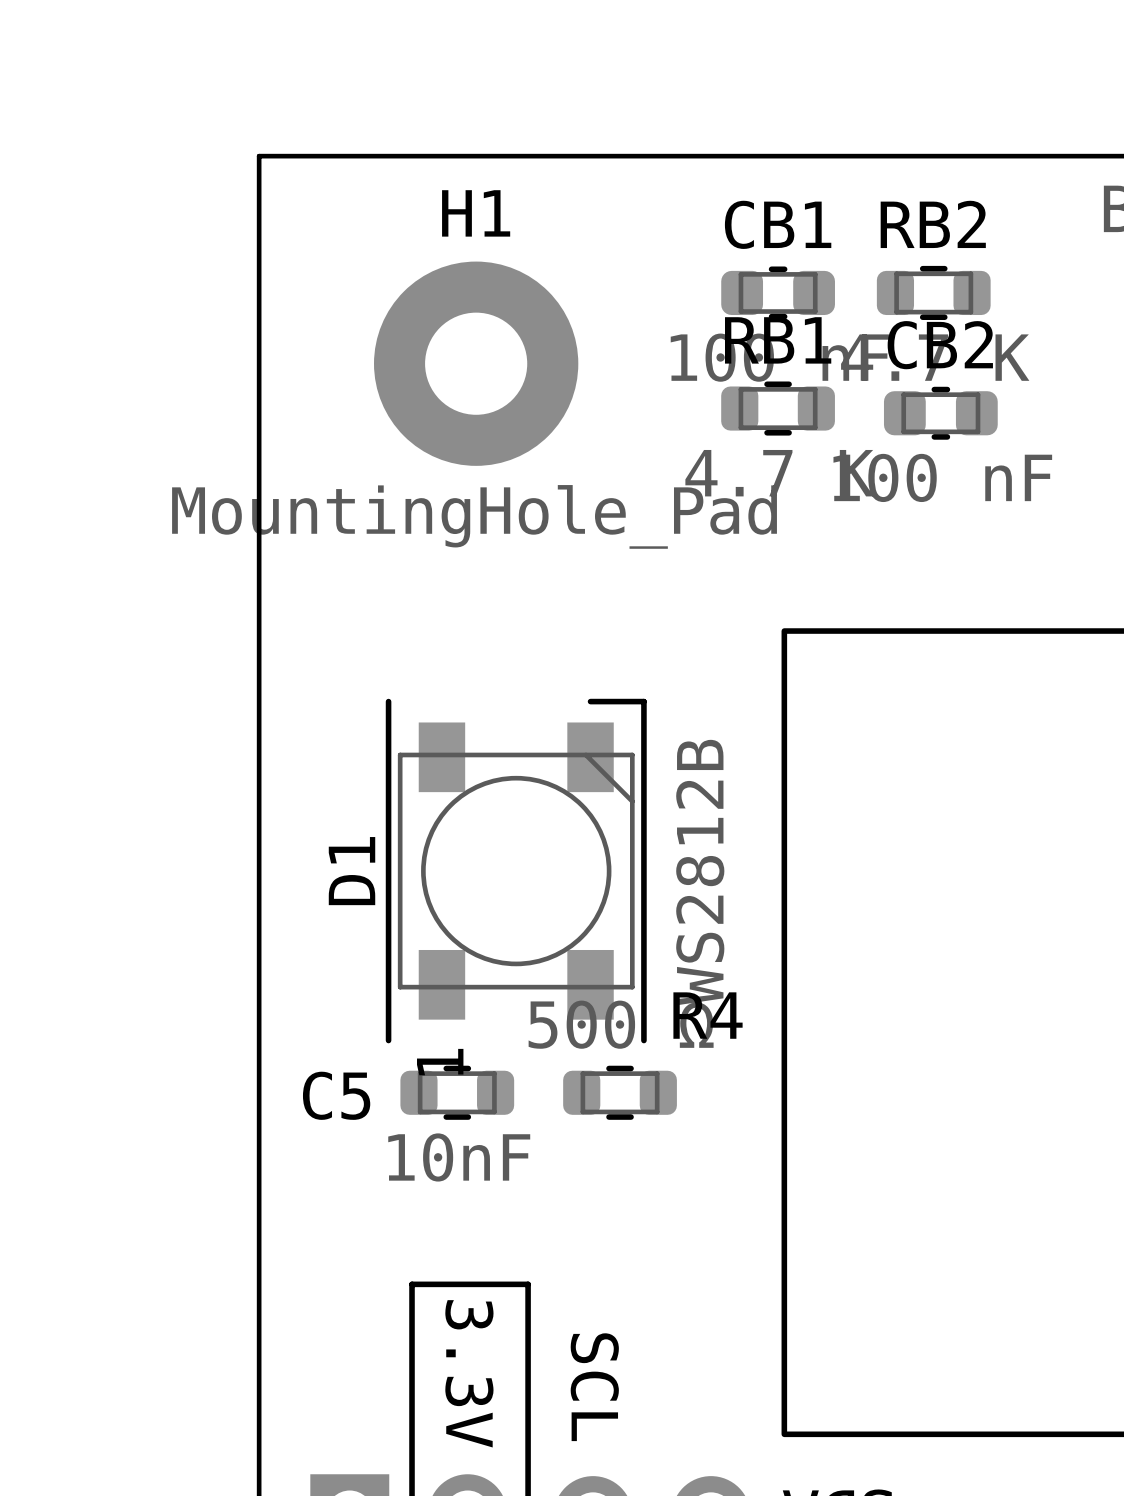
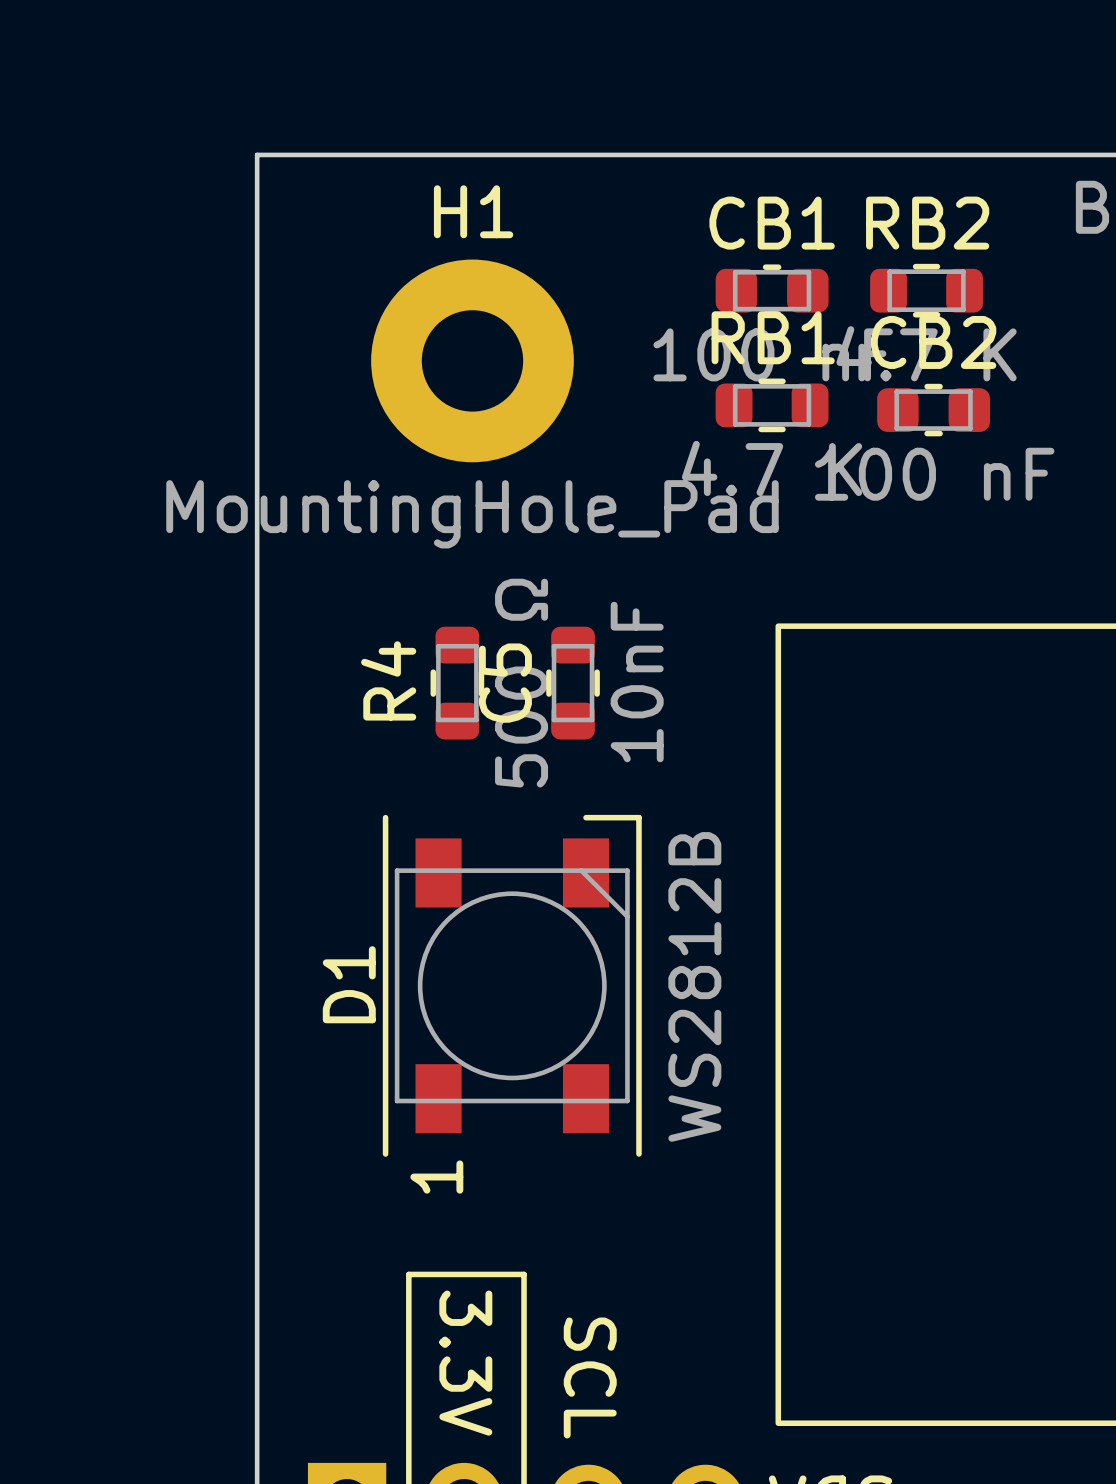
D1 position: (516, 871) -> (512, 985)
R4 name position: R4 (708, 1015) -> R4 (388, 680)
C5 rotation: 0° (457, 1092) -> 90° clockwise (573, 683)
C5 position: (457, 1092) -> (573, 683)
R4 rotation: 0° (620, 1092) -> 90° clockwise (457, 683)
R4 position: (620, 1092) -> (457, 683)
C5 value position: 10nF (459, 1157) -> 10nF (637, 682)

